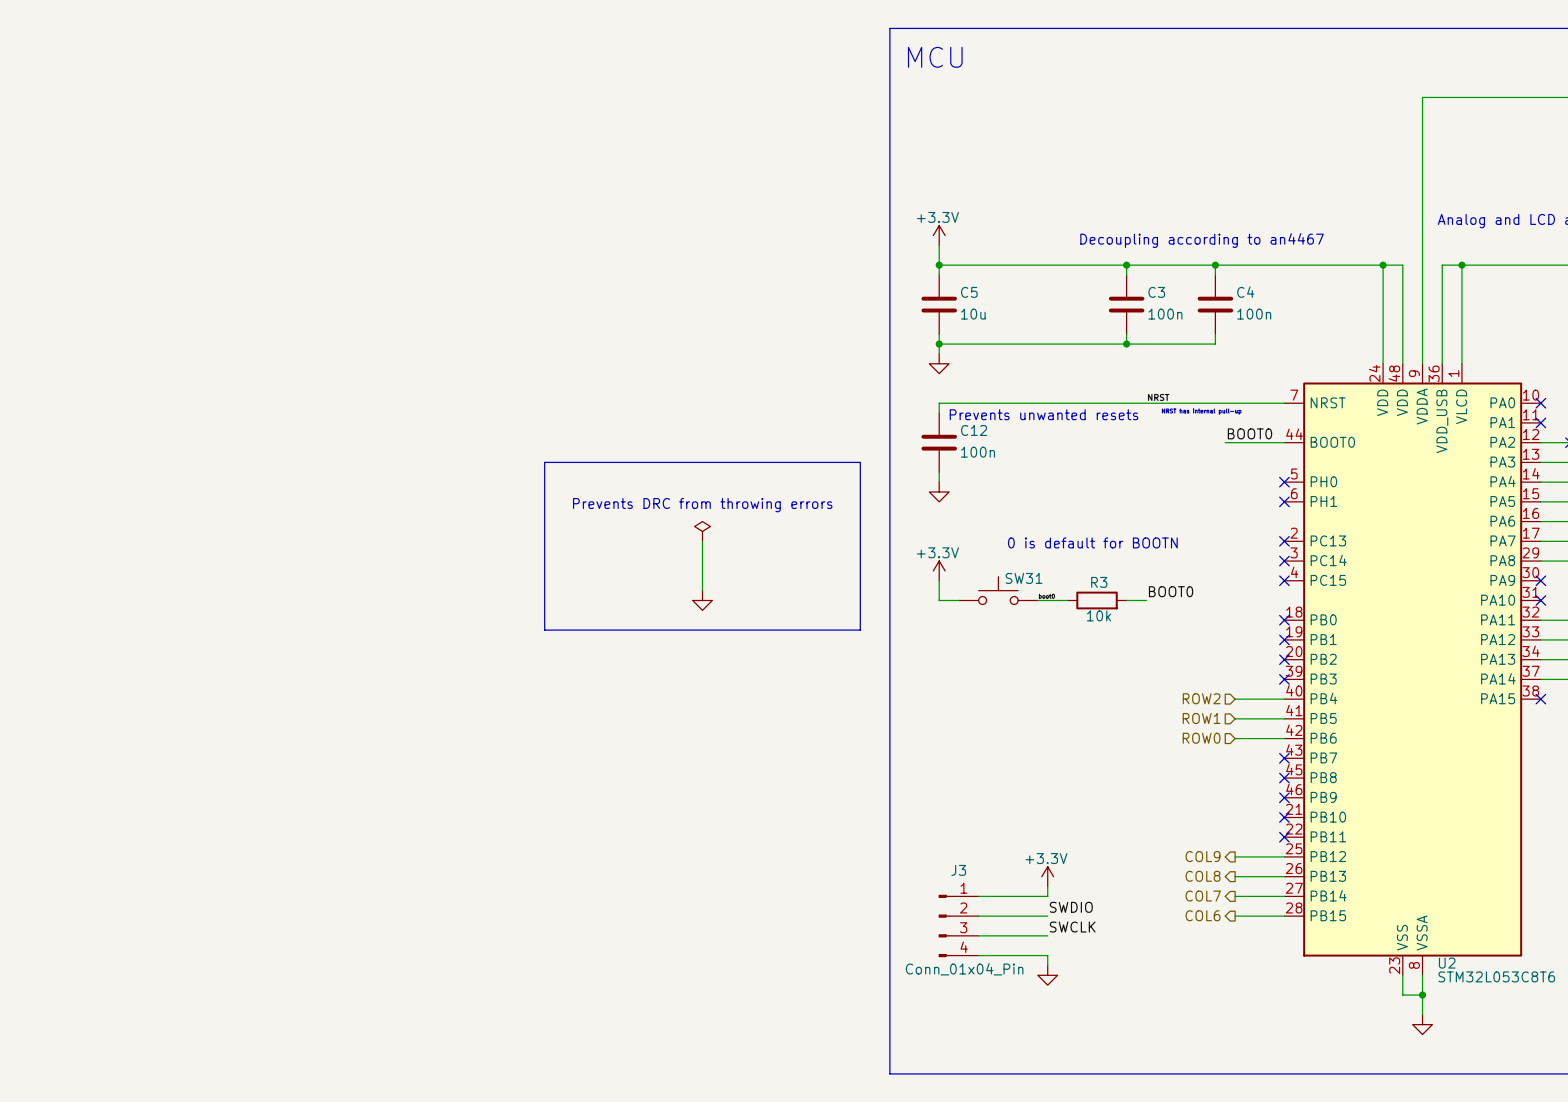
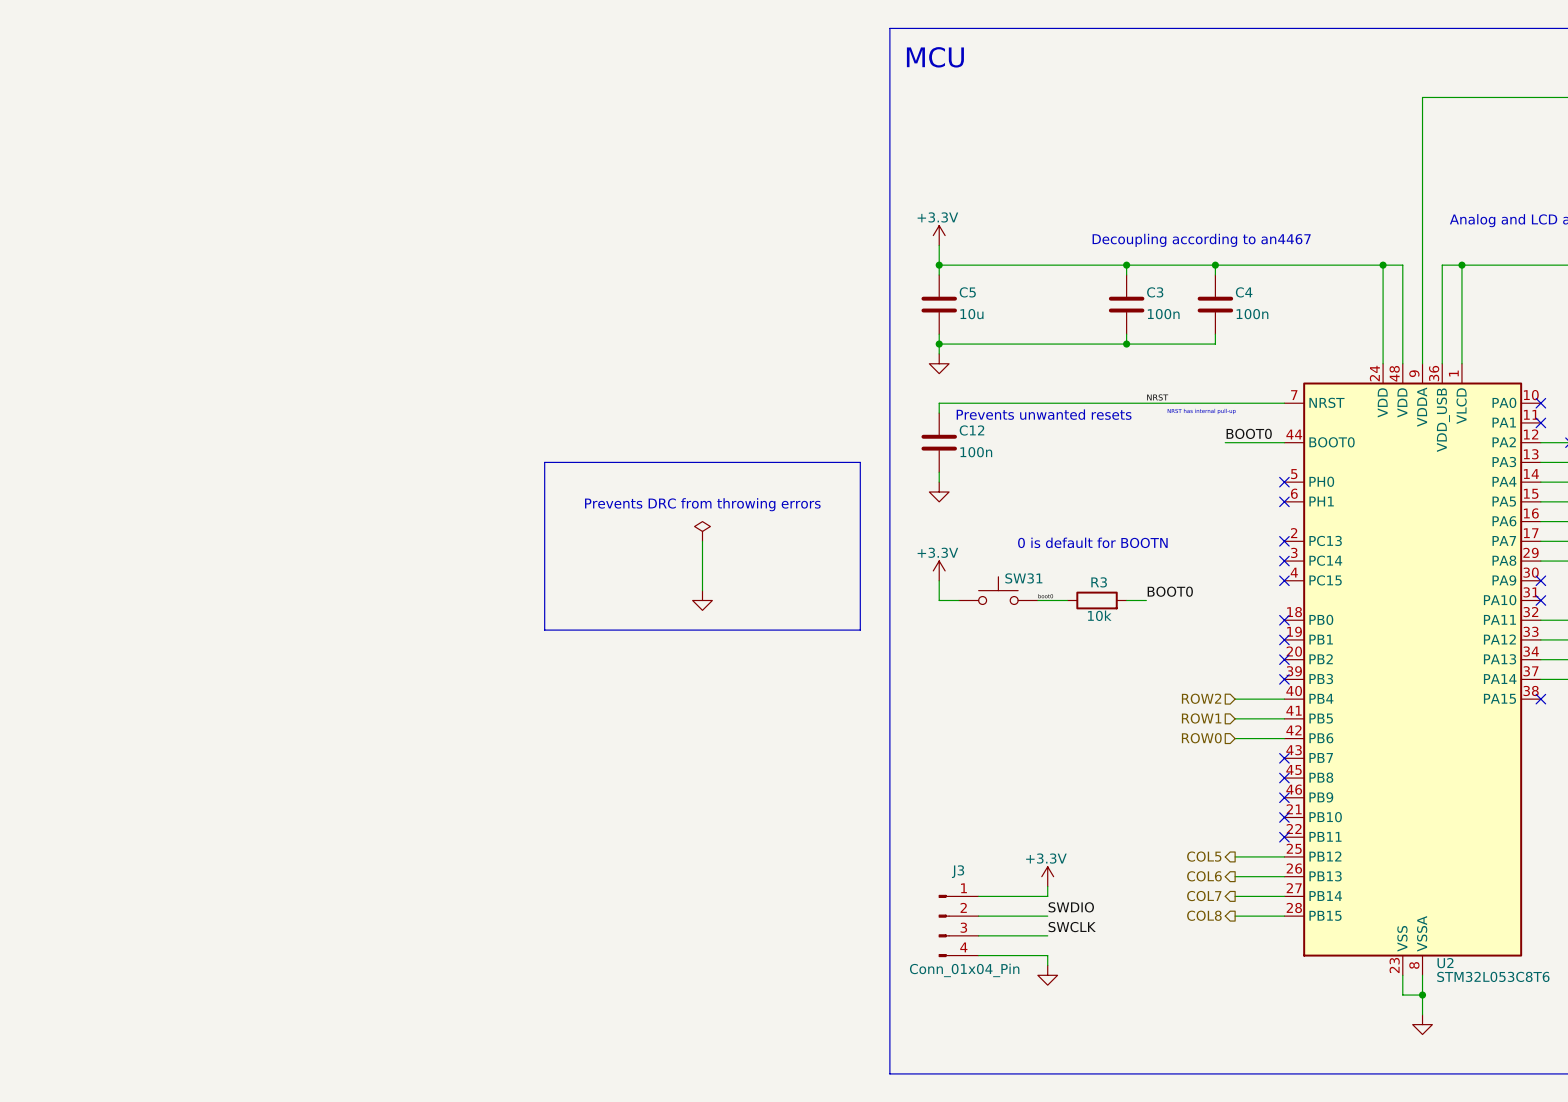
hierarchical label: COL9 (1203, 856) -> COL5 (1204, 856)
hierarchical label: COL8 (1203, 876) -> COL6 (1204, 876)
hierarchical label: COL6 (1203, 915) -> COL8 (1204, 915)

